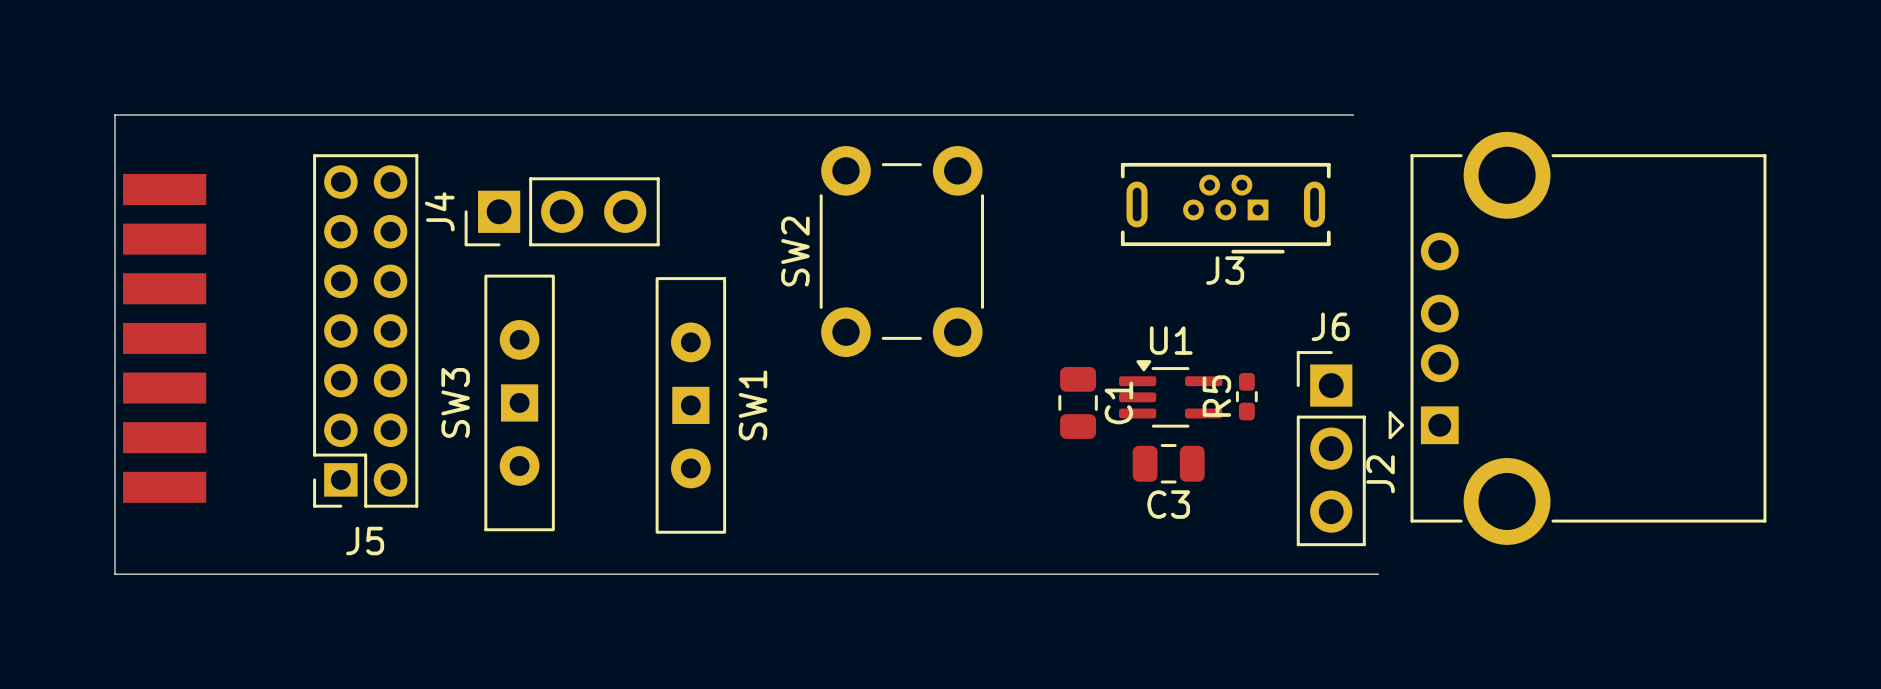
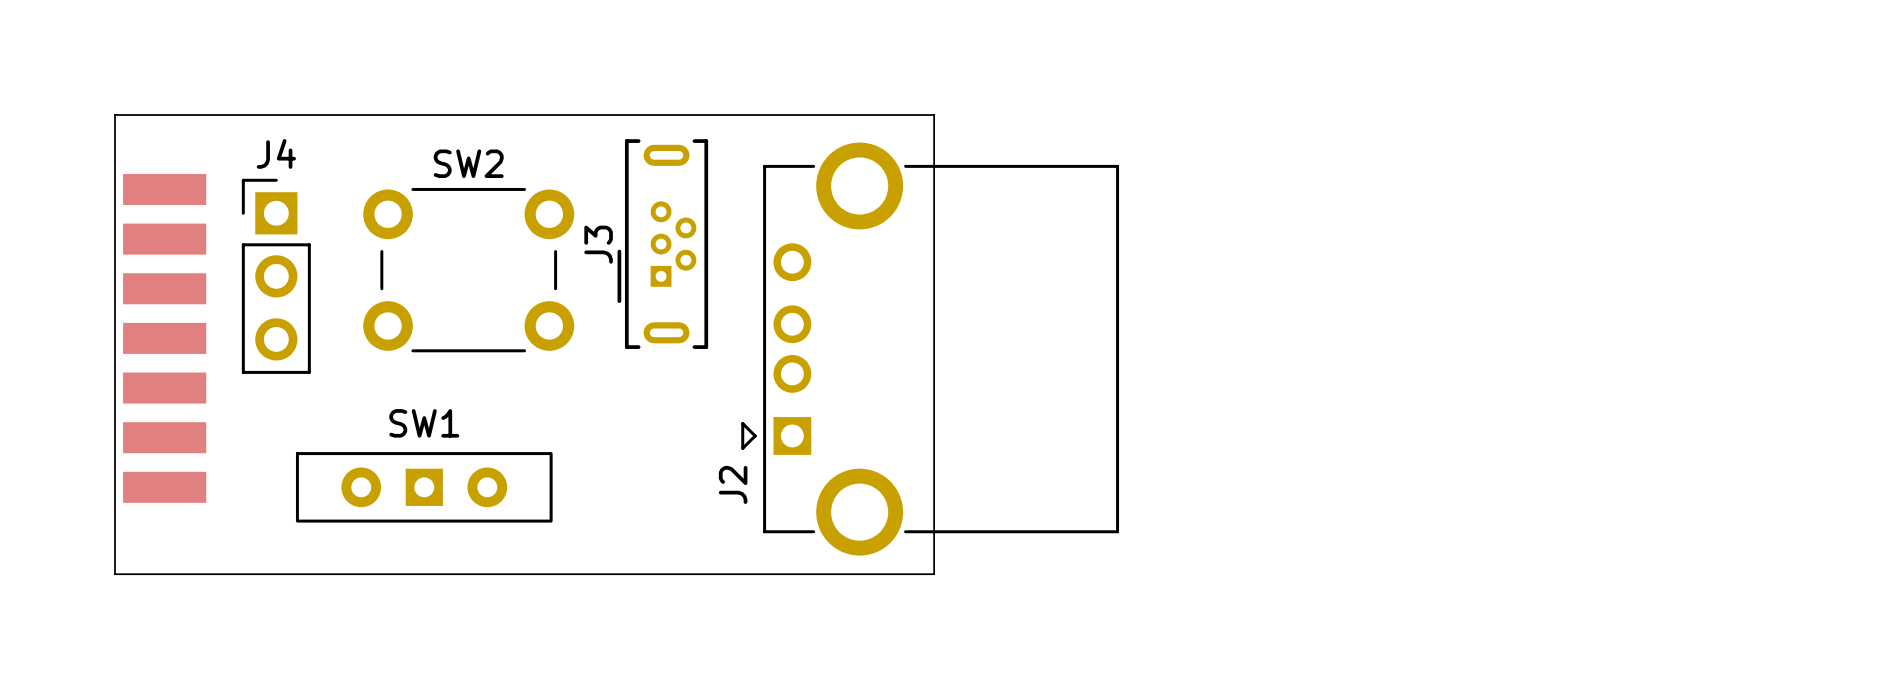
board edge: (934, 115) (1353, 115) -> (934, 115) (934, 574)
J3 rotation: 0° (1225, 208) -> 90° clockwise (662, 244)
J3 position: (1225, 208) -> (662, 244)
J4 rotation: 0° (562, 211) -> 90° clockwise (276, 276)
J4 position: (562, 211) -> (276, 276)
SW2 rotation: 0° (901, 251) -> 90° clockwise (468, 270)
SW2 position: (901, 251) -> (468, 270)
J5: (365, 330) -> none
J2 position: (1577, 338) -> (930, 349)
U1: (1170, 393) -> none
R5: (1246, 396) -> none
SW3: (519, 402) -> none
C1: (1078, 402) -> none
SW1 rotation: 0° (690, 405) -> 90° clockwise (424, 487)
SW1 position: (690, 405) -> (424, 487)
SW1 name position: SW1 (752, 405) -> SW1 (424, 423)
J6: (1331, 448) -> none
C3: (1168, 463) -> none
board edge: (934, 574) (1378, 574) -> none

